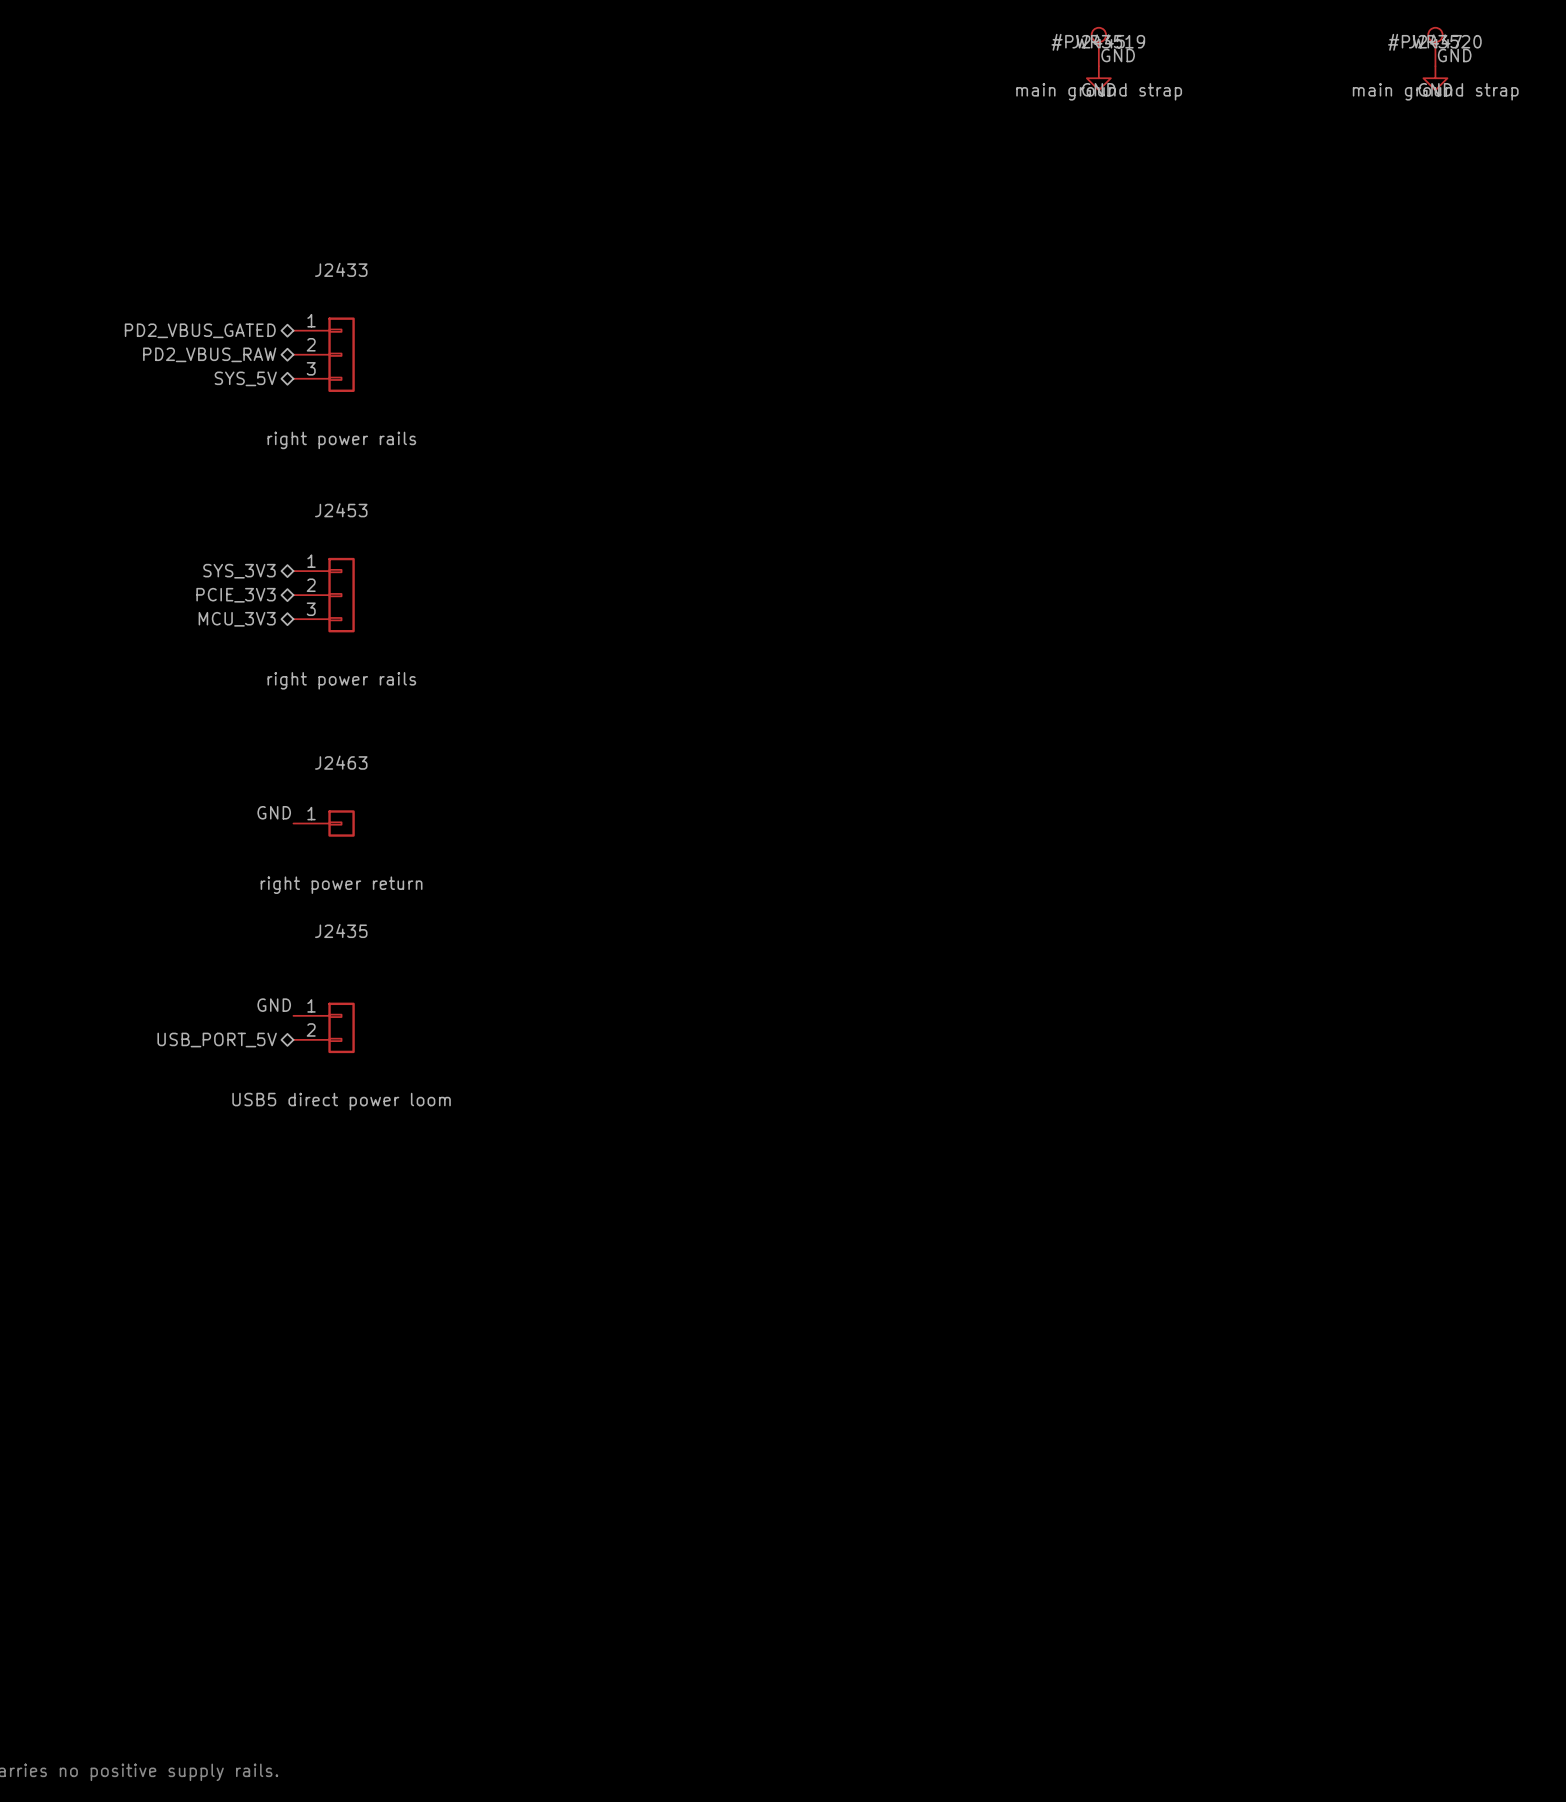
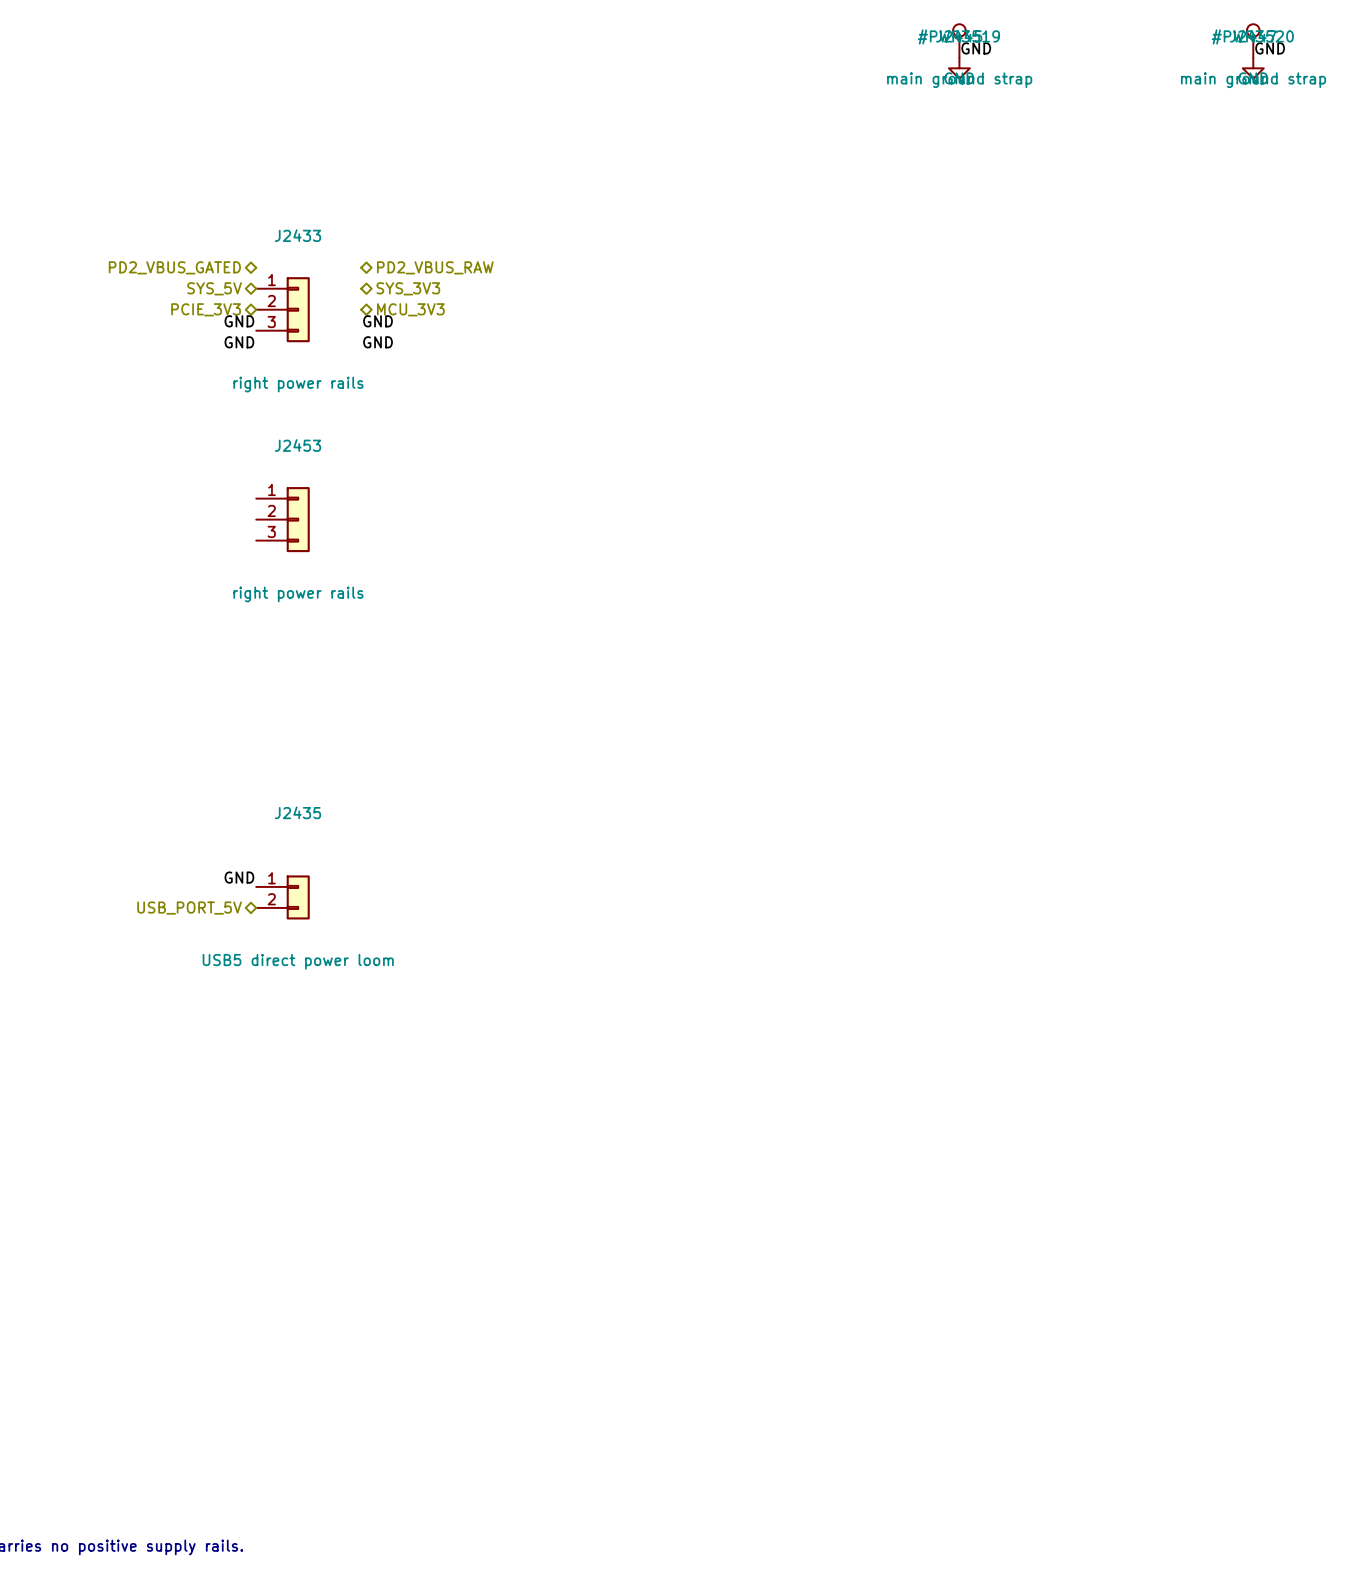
hierarchical label: none -> PD2_VBUS_GATED (174, 267)
hierarchical label: none -> PD2_VBUS_RAW (435, 267)
hierarchical label: PD2_VBUS_GATED (200, 330) -> SYS_5V (214, 288)
hierarchical label: none -> SYS_3V3 (408, 288)
hierarchical label: PD2_VBUS_RAW (209, 354) -> PCIE_3V3 (206, 309)
hierarchical label: none -> MCU_3V3 (410, 309)
label: none -> GND (239, 321)
label: none -> GND (378, 321)
hierarchical label: SYS_5V (245, 378) -> none
label: none -> GND (239, 342)
label: none -> GND (378, 342)
hierarchical label: SYS_3V3 (239, 571) -> none
hierarchical label: PCIE_3V3 (236, 595) -> none
hierarchical label: MCU_3V3 (237, 619) -> none
label: GND (274, 812) -> none
J2463: right power return (324, 823) -> none

